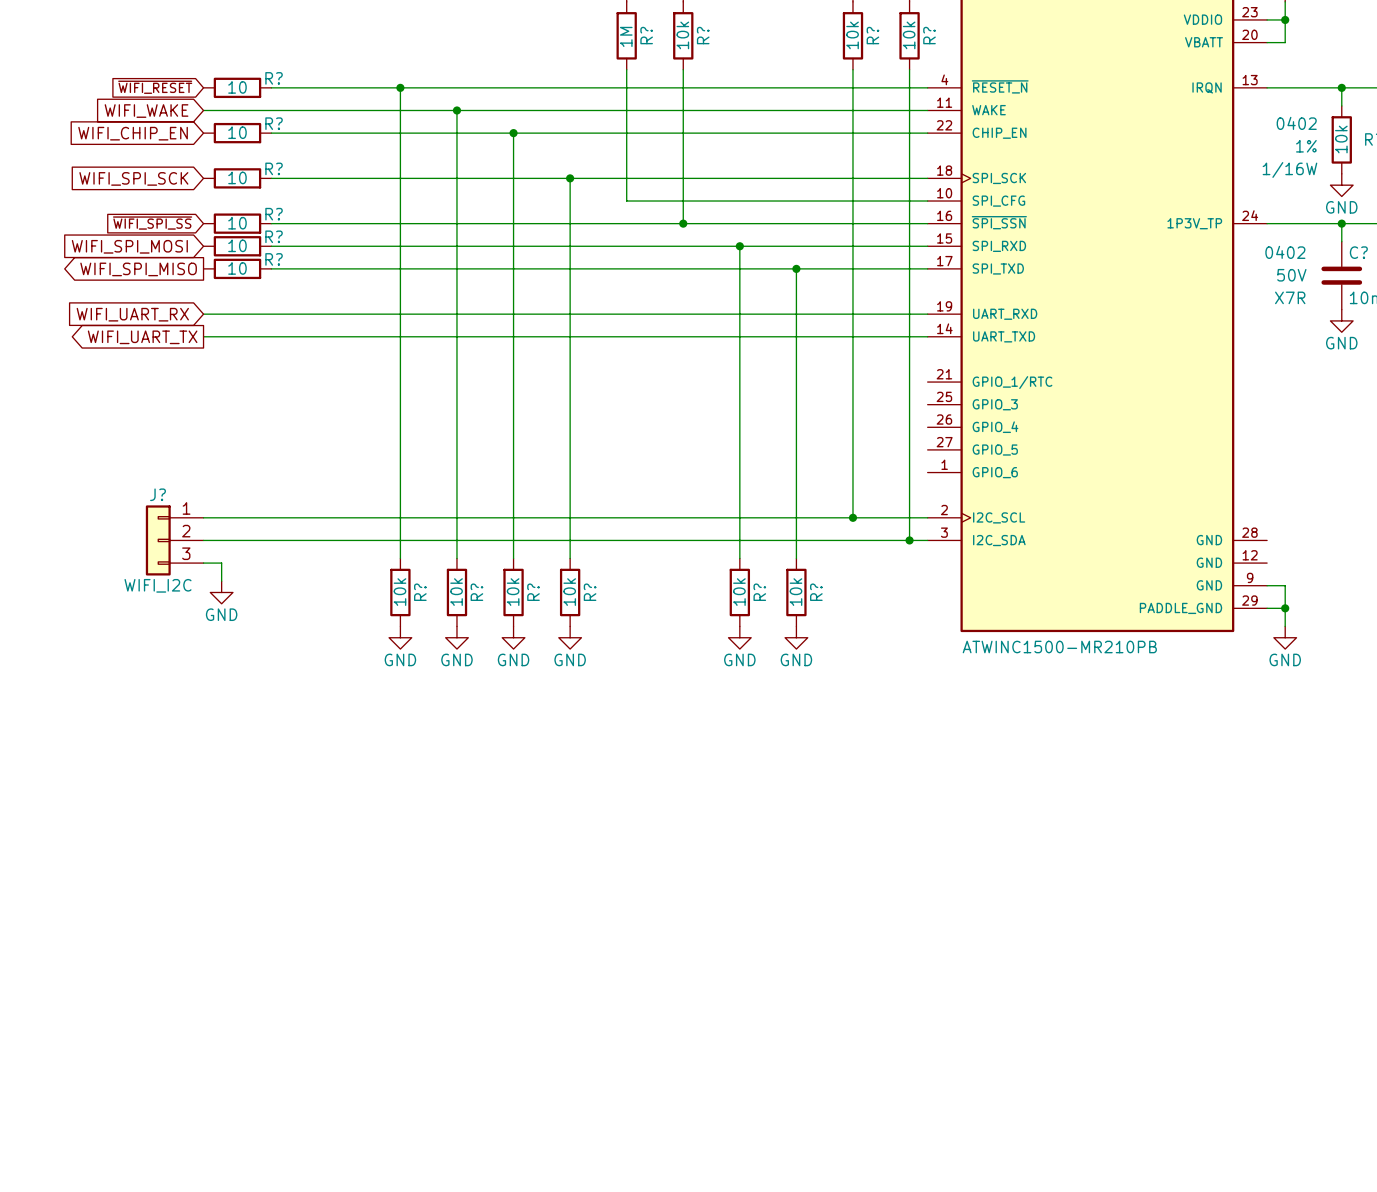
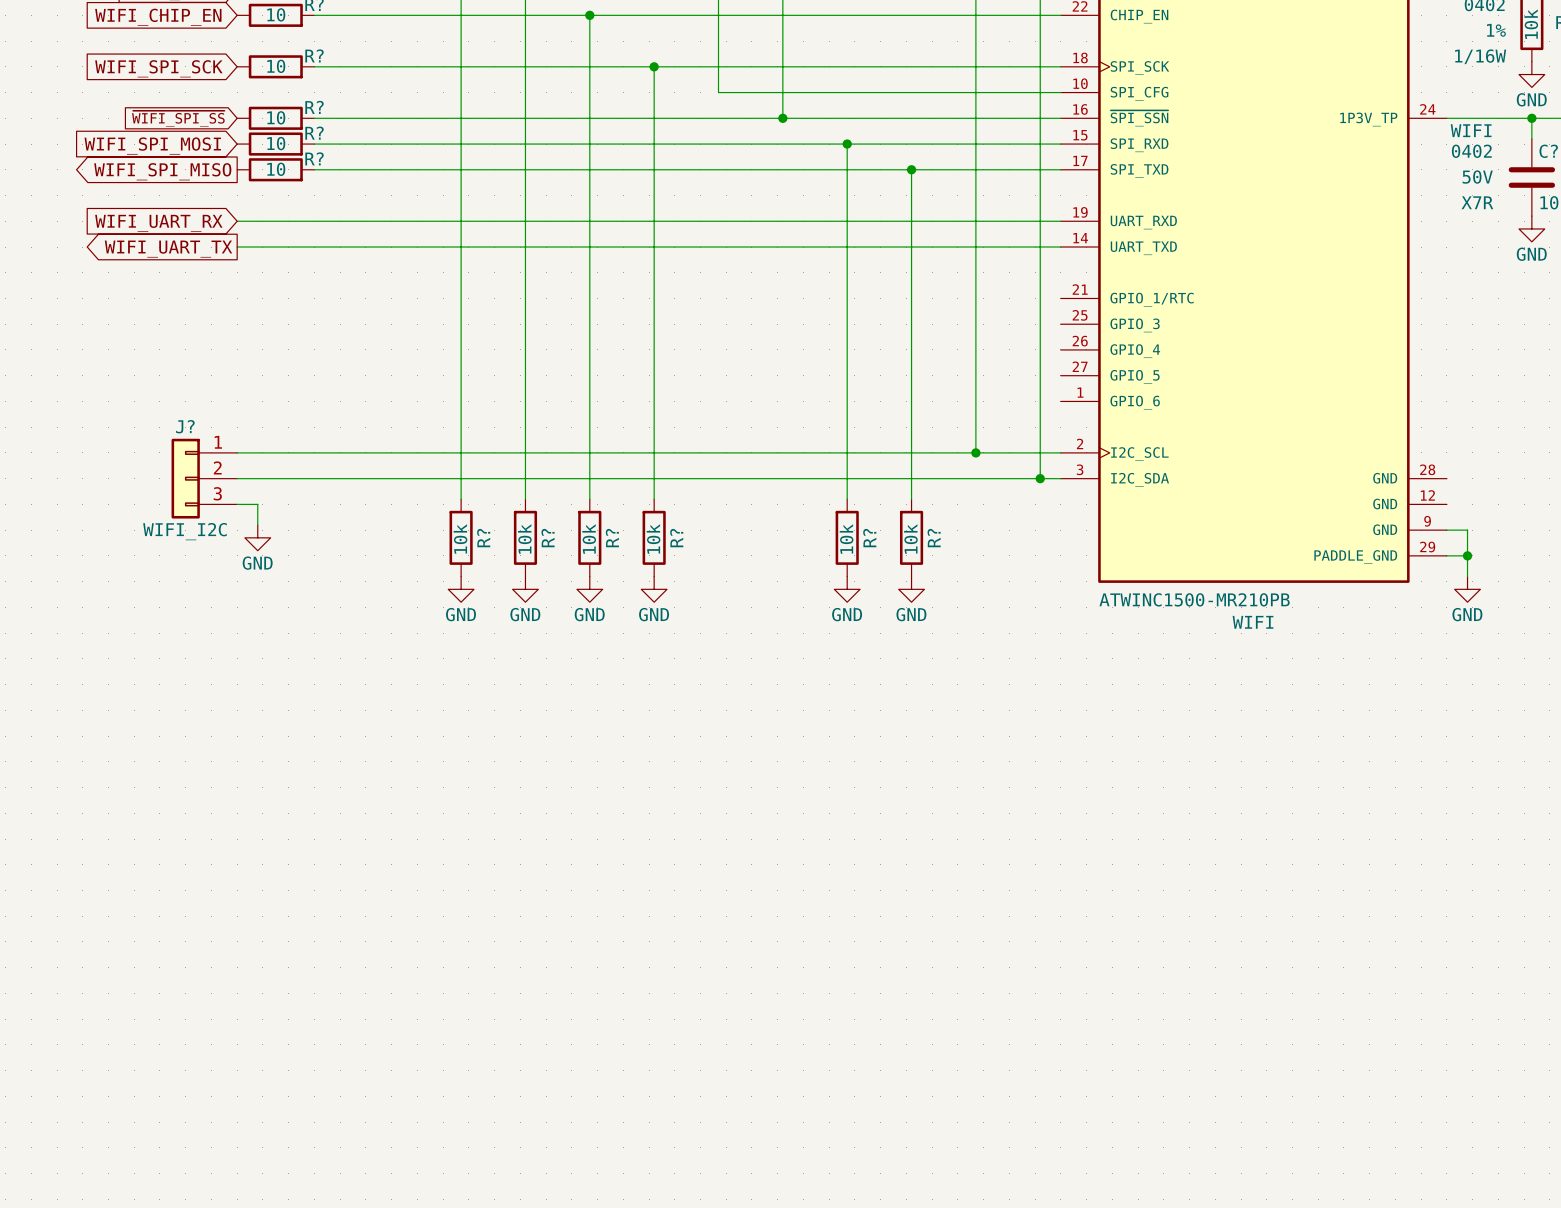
C? text: none -> WIFI (1471, 130)
part text: none -> WIFI (1253, 622)

